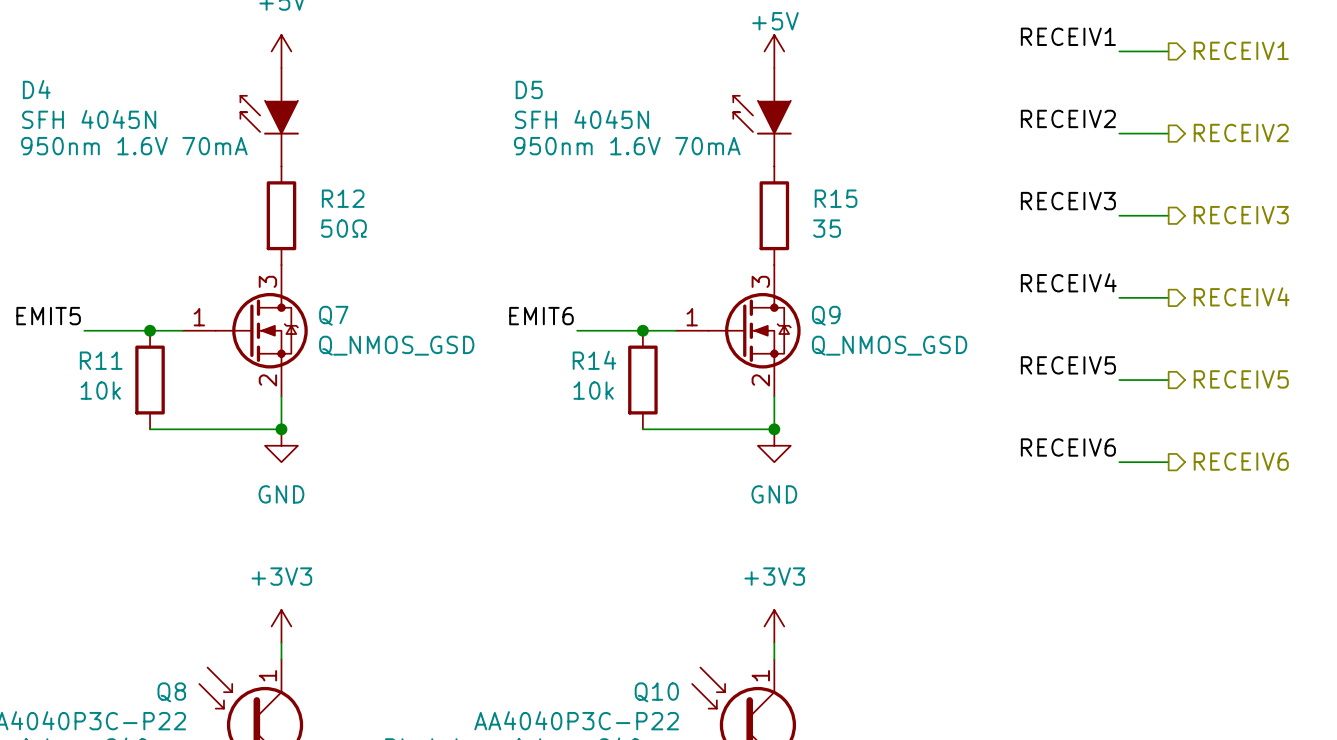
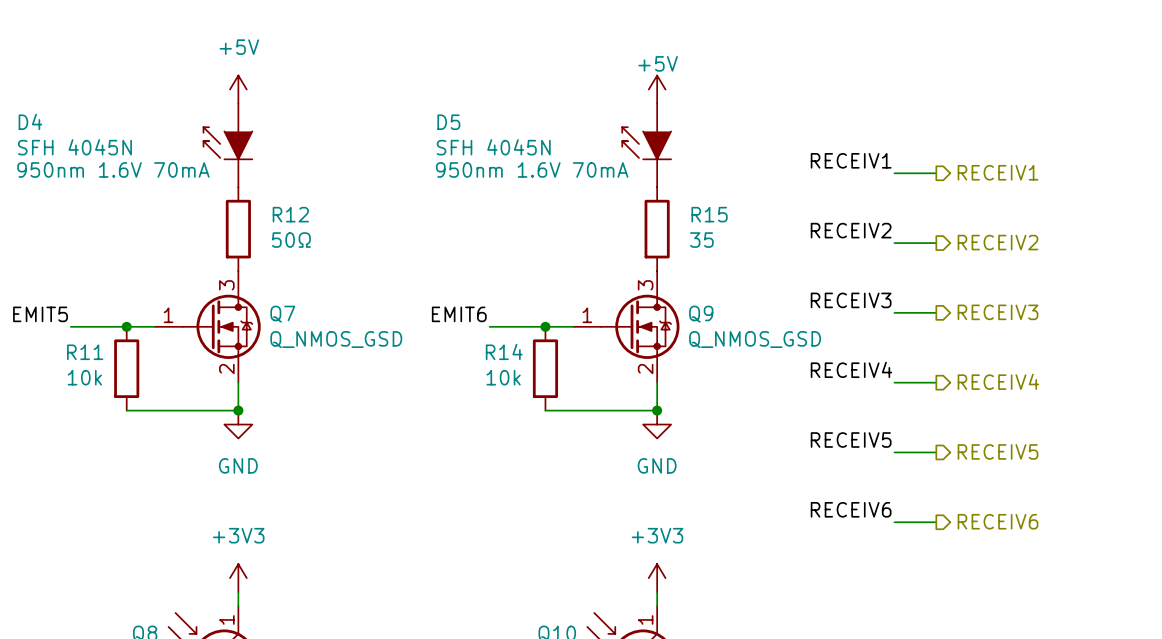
label position: RECEIV1 (1068, 36) -> RECEIV1 (851, 160)
hierarchical label position: RECEIV1 (1241, 50) -> RECEIV1 (998, 172)
wire: (1119, 51) (1168, 51) -> (894, 173) (936, 173)
label position: RECEIV2 (1068, 118) -> RECEIV2 (851, 230)
hierarchical label position: RECEIV2 (1241, 132) -> RECEIV2 (998, 242)
wire: (1119, 133) (1168, 133) -> (894, 243) (936, 243)
label position: RECEIV3 (1068, 201) -> RECEIV3 (851, 300)
wire: (1119, 215) (1168, 215) -> (894, 312) (936, 312)
hierarchical label position: RECEIV3 (1241, 215) -> RECEIV3 (998, 312)
label position: RECEIV4 (1068, 282) -> RECEIV4 (851, 369)
hierarchical label position: RECEIV4 (1241, 296) -> RECEIV4 (998, 381)
wire: (1119, 297) (1168, 297) -> (894, 382) (936, 382)
label position: RECEIV5 (1068, 365) -> RECEIV5 (851, 440)
hierarchical label position: RECEIV5 (1241, 379) -> RECEIV5 (998, 451)
wire: (1119, 380) (1168, 380) -> (894, 452) (936, 452)
label position: RECEIV6 (1068, 447) -> RECEIV6 (851, 509)
hierarchical label position: RECEIV6 (1241, 461) -> RECEIV6 (998, 521)
wire: (1119, 462) (1168, 462) -> (894, 522) (936, 522)

